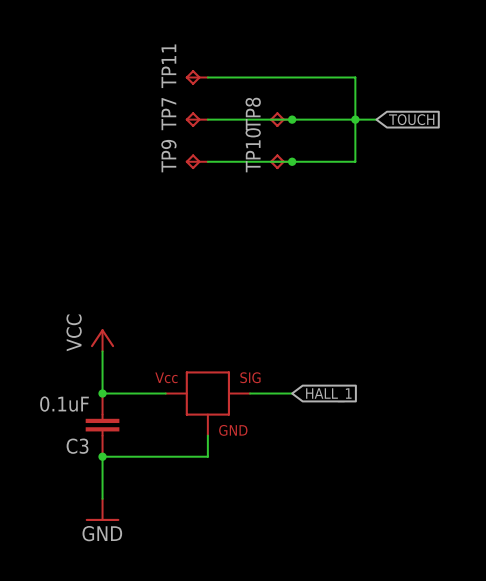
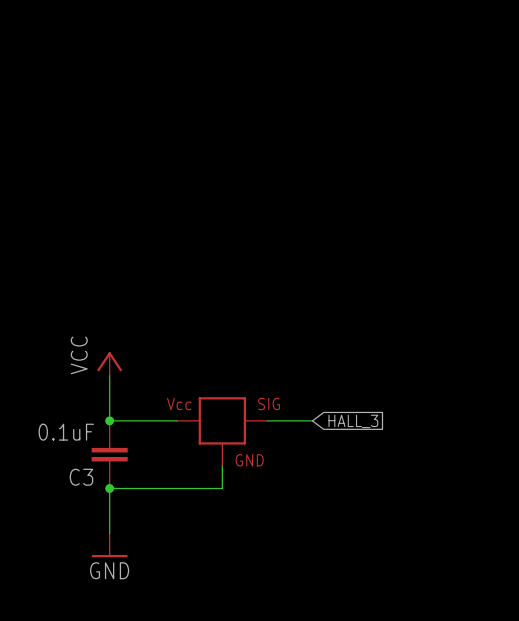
TP11: (196, 77) -> none
wire: (207, 77) (355, 77) (355, 161) (207, 161) -> none
TP7: (196, 119) -> none
wire: (207, 119) (376, 119) -> none
TP8: (281, 119) -> none
junction: (292, 119) -> none
junction: (355, 119) -> none
global label: TOUCH (411, 119) -> none
TP9: (196, 161) -> none
TP10: (281, 161) -> none
junction: (292, 161) -> none
global label: HALL_1 (328, 395) -> HALL_3 (353, 421)

